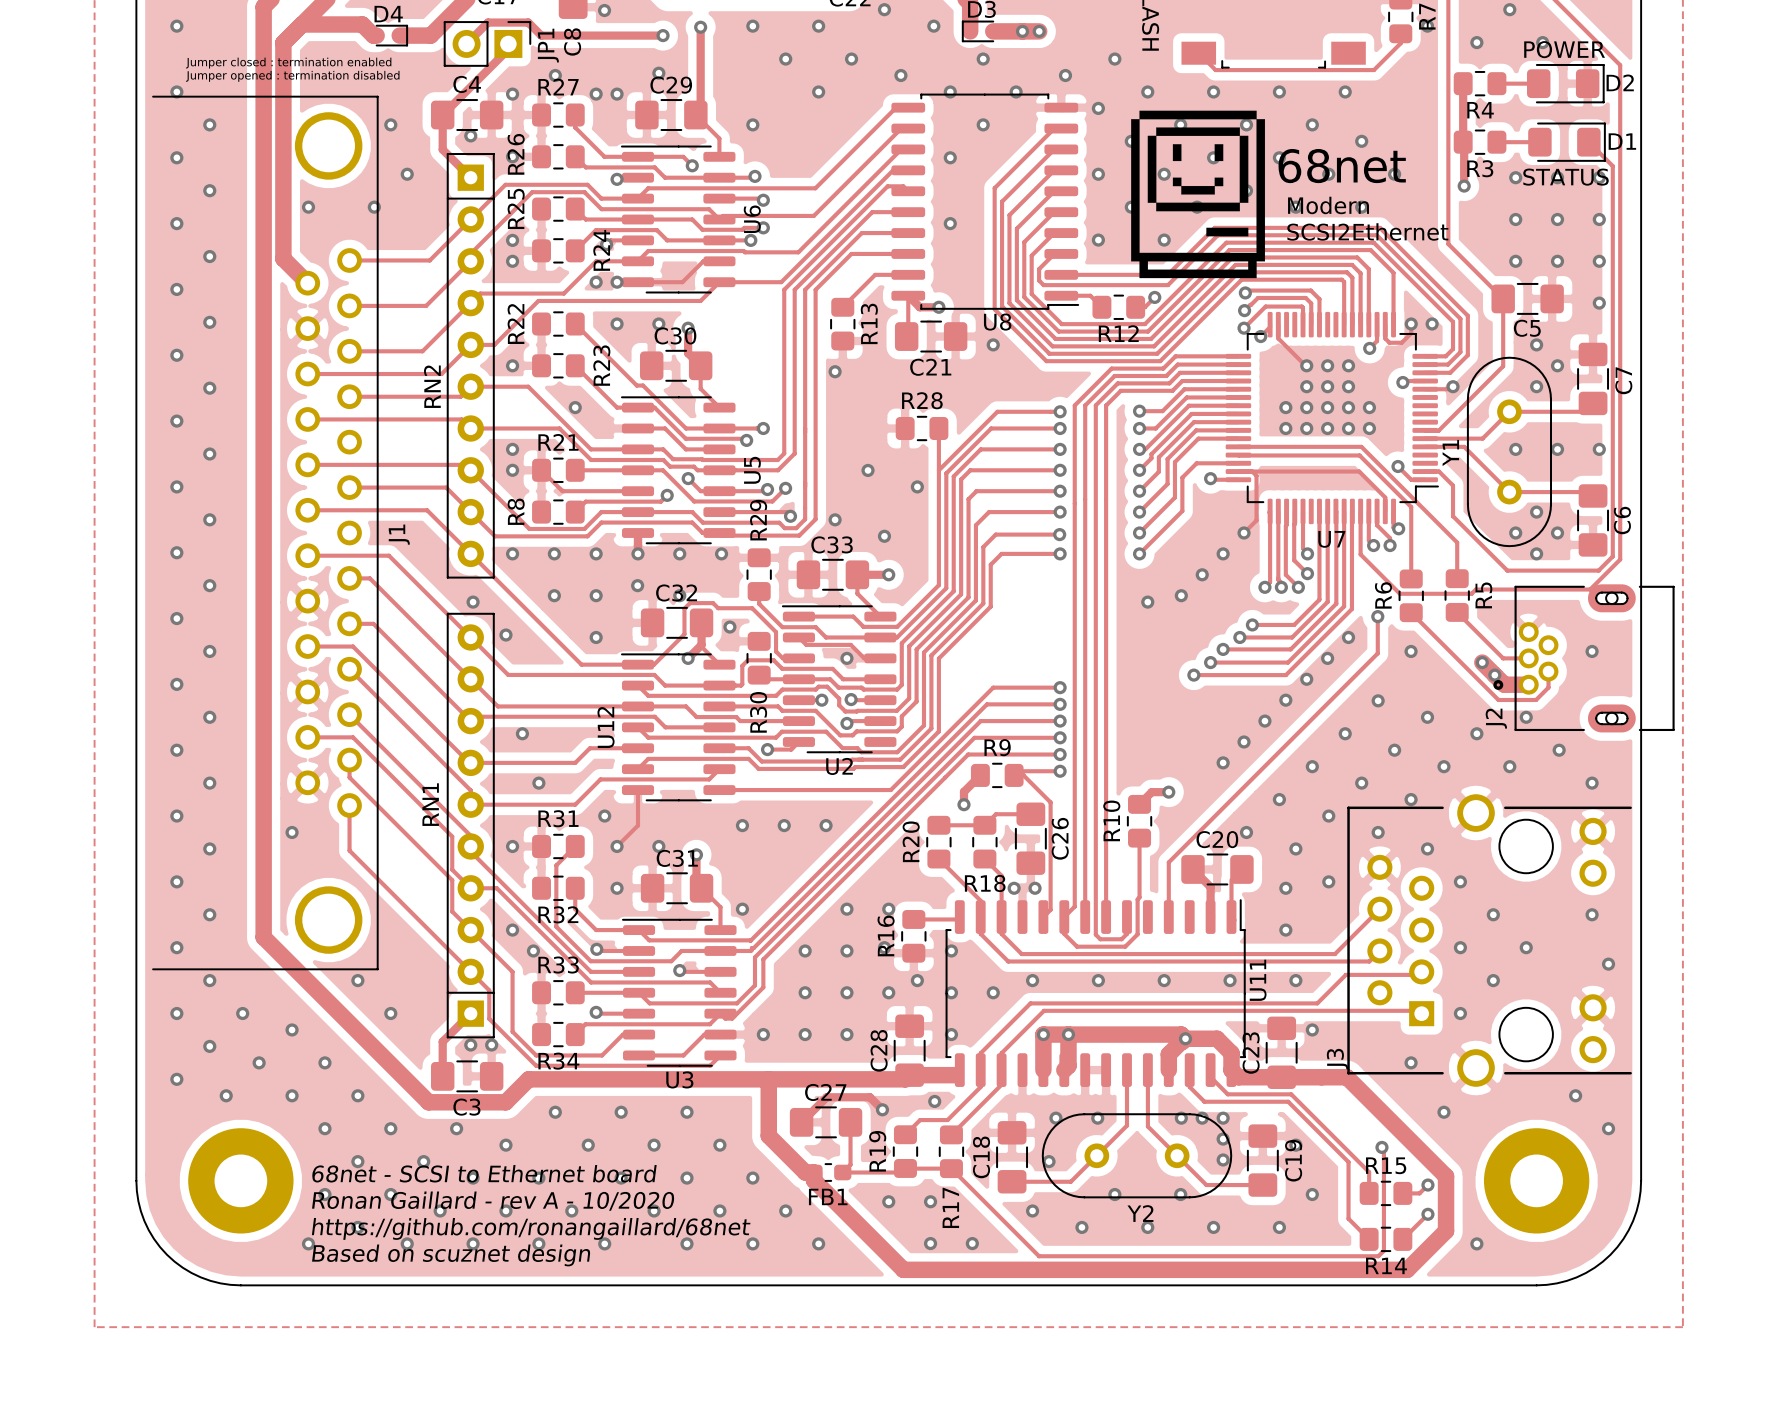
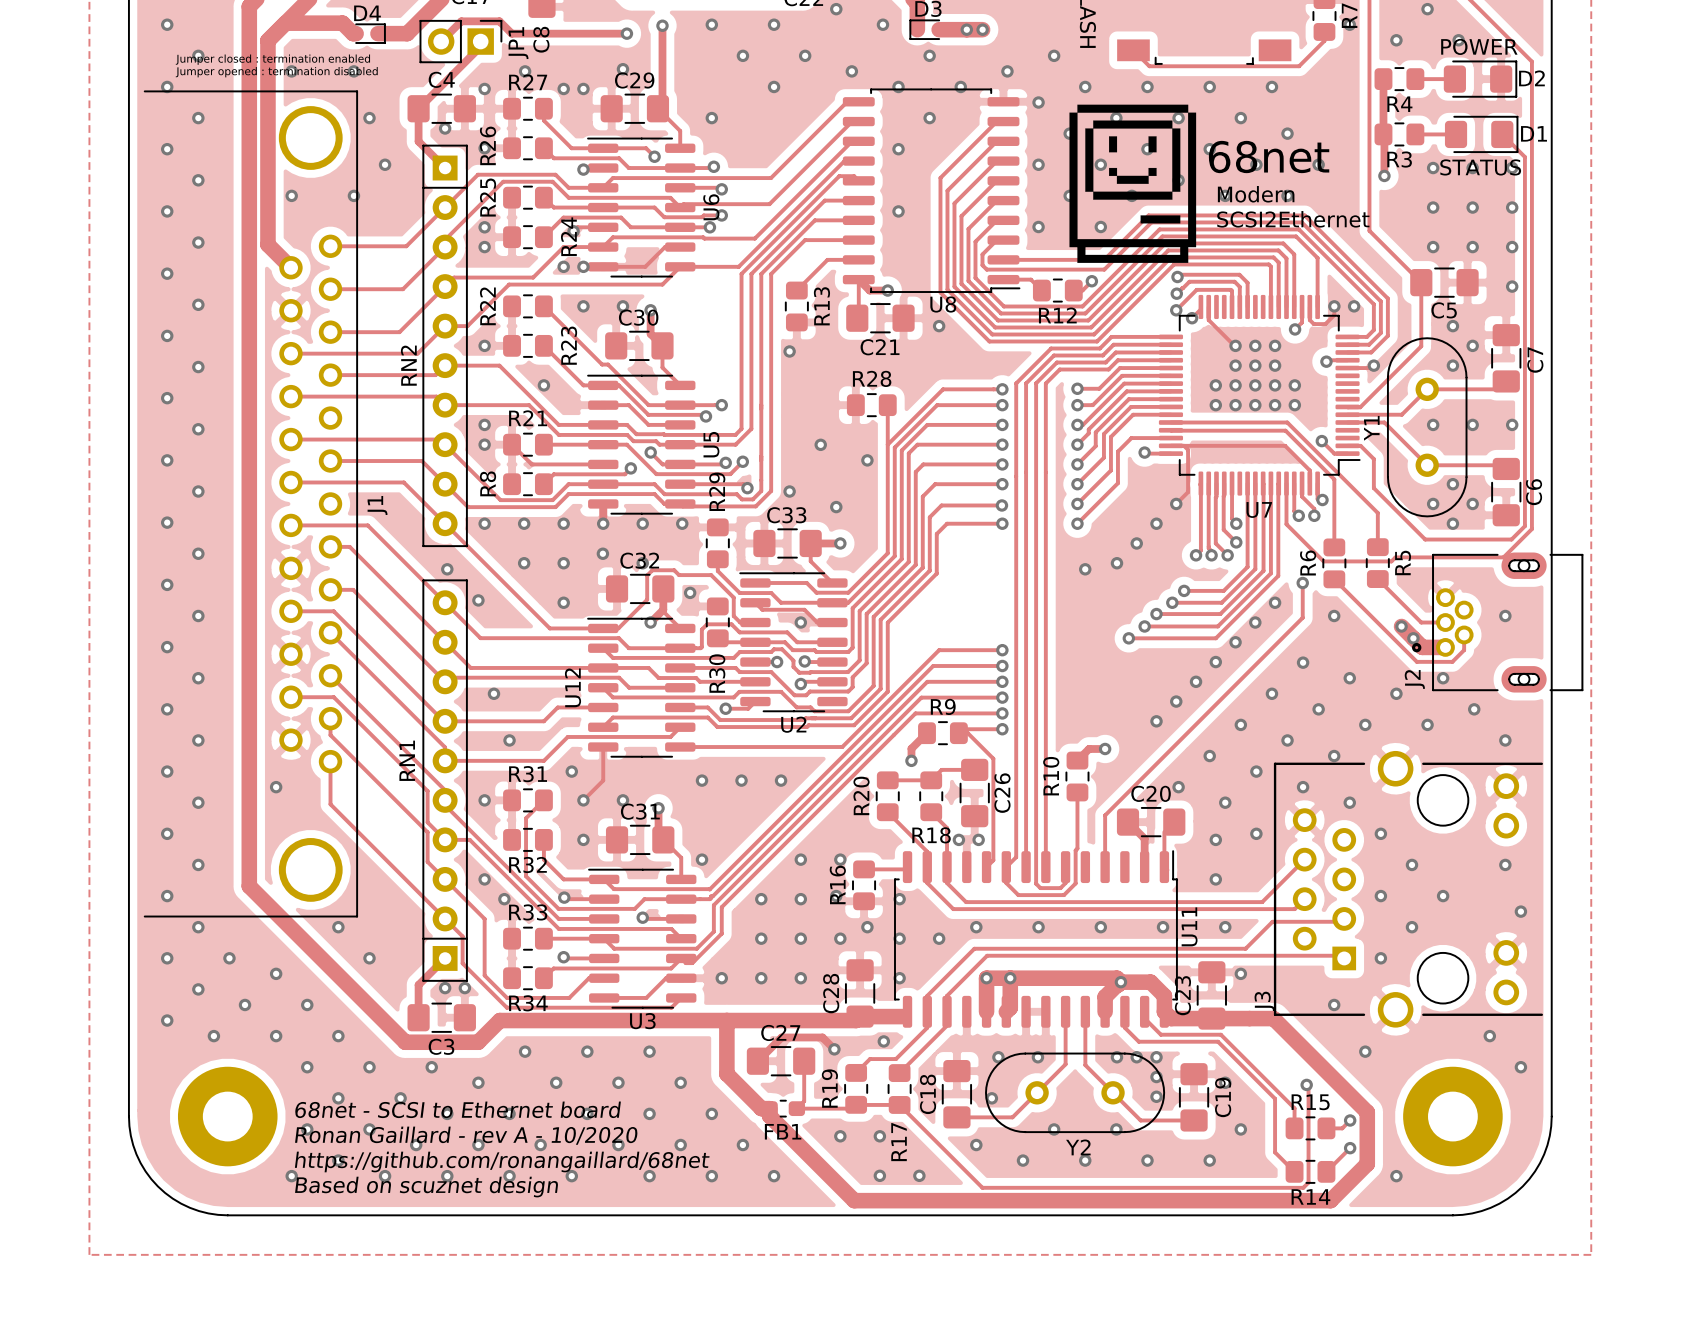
via: (604, 10) -> none
via: none -> (198, 55)
via: none -> (291, 71)
via: none -> (353, 71)

